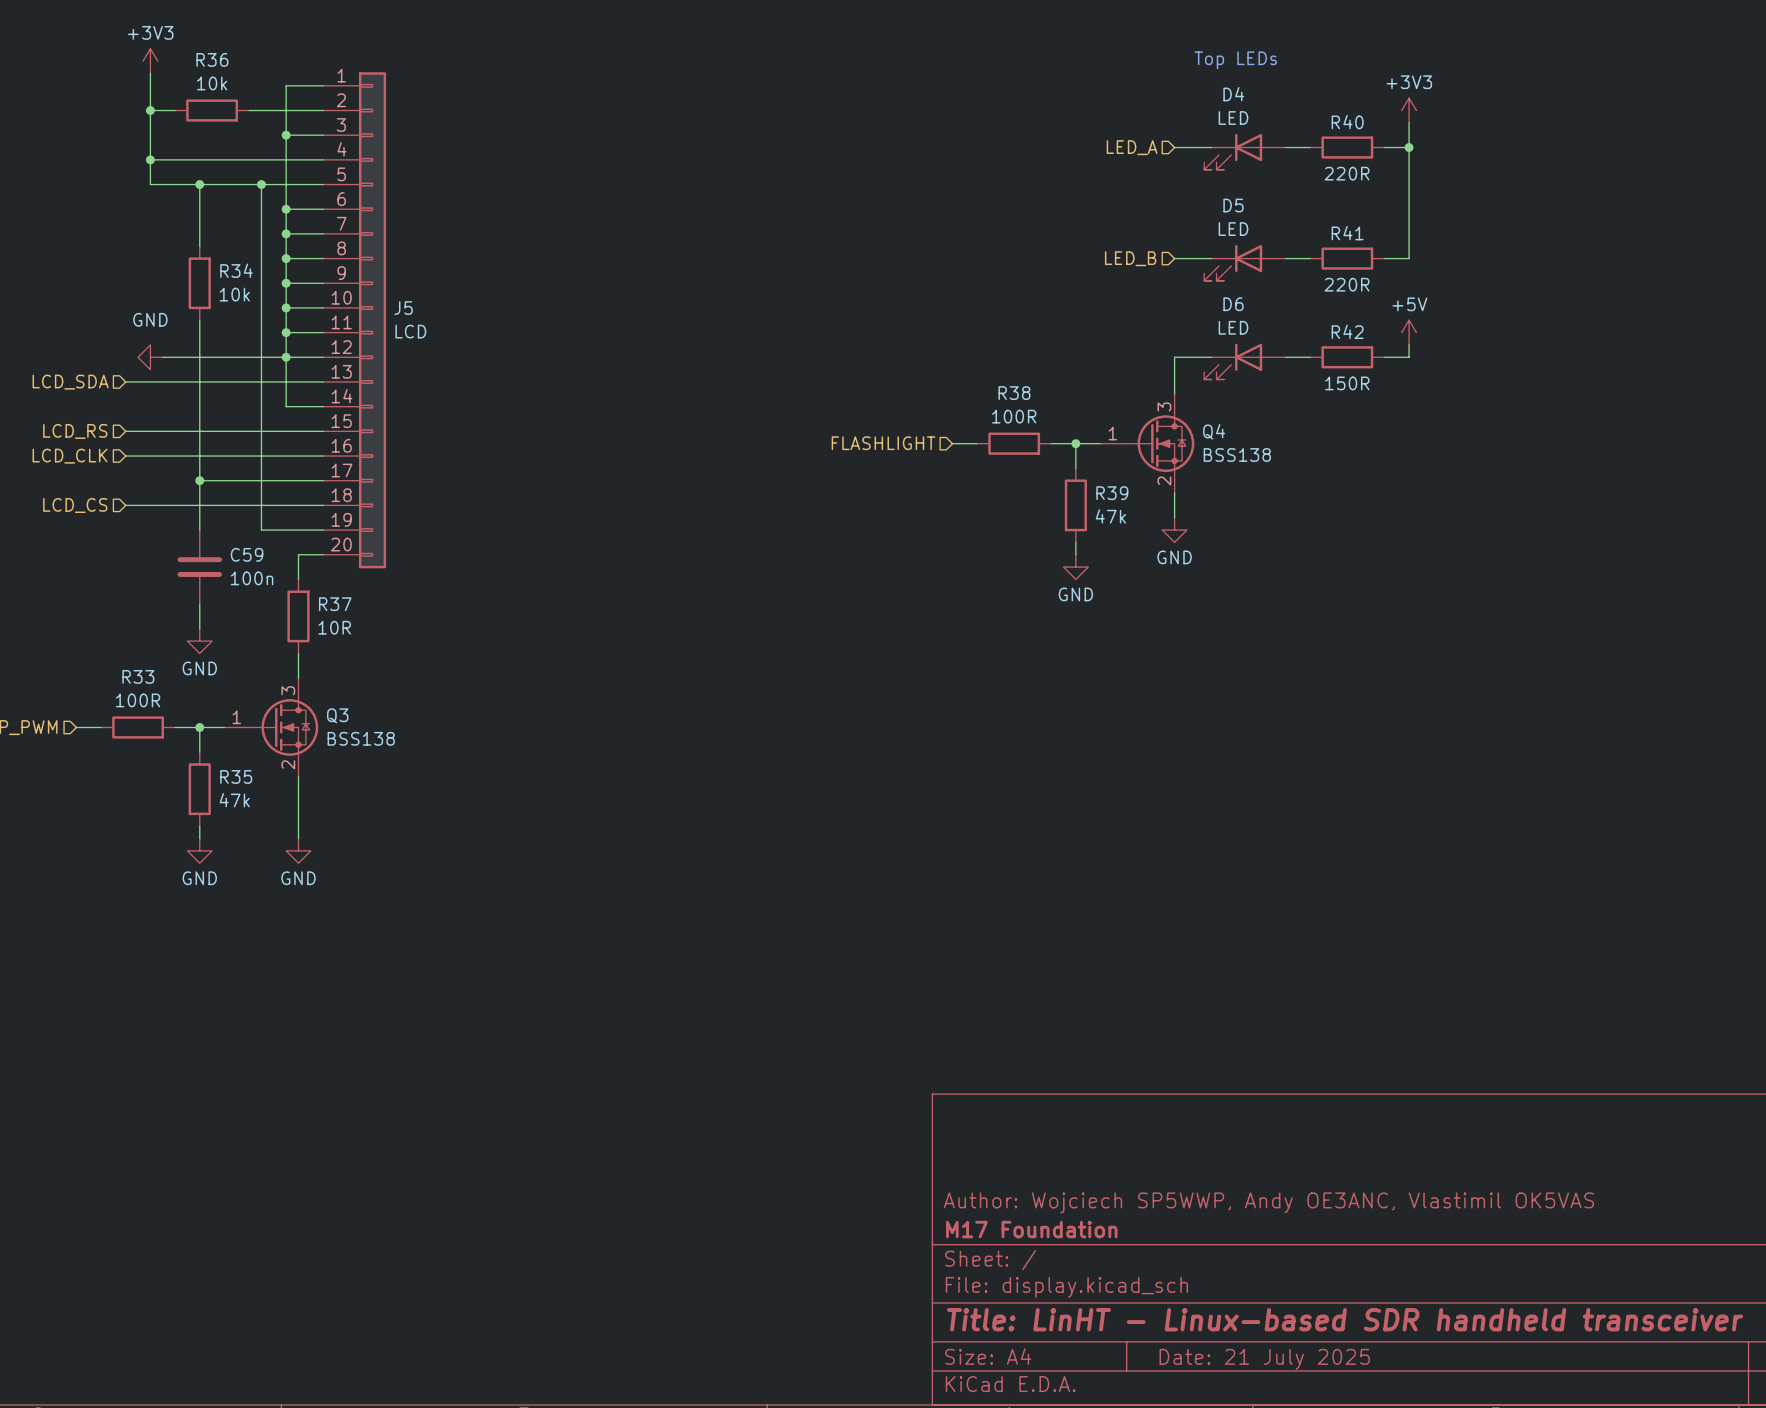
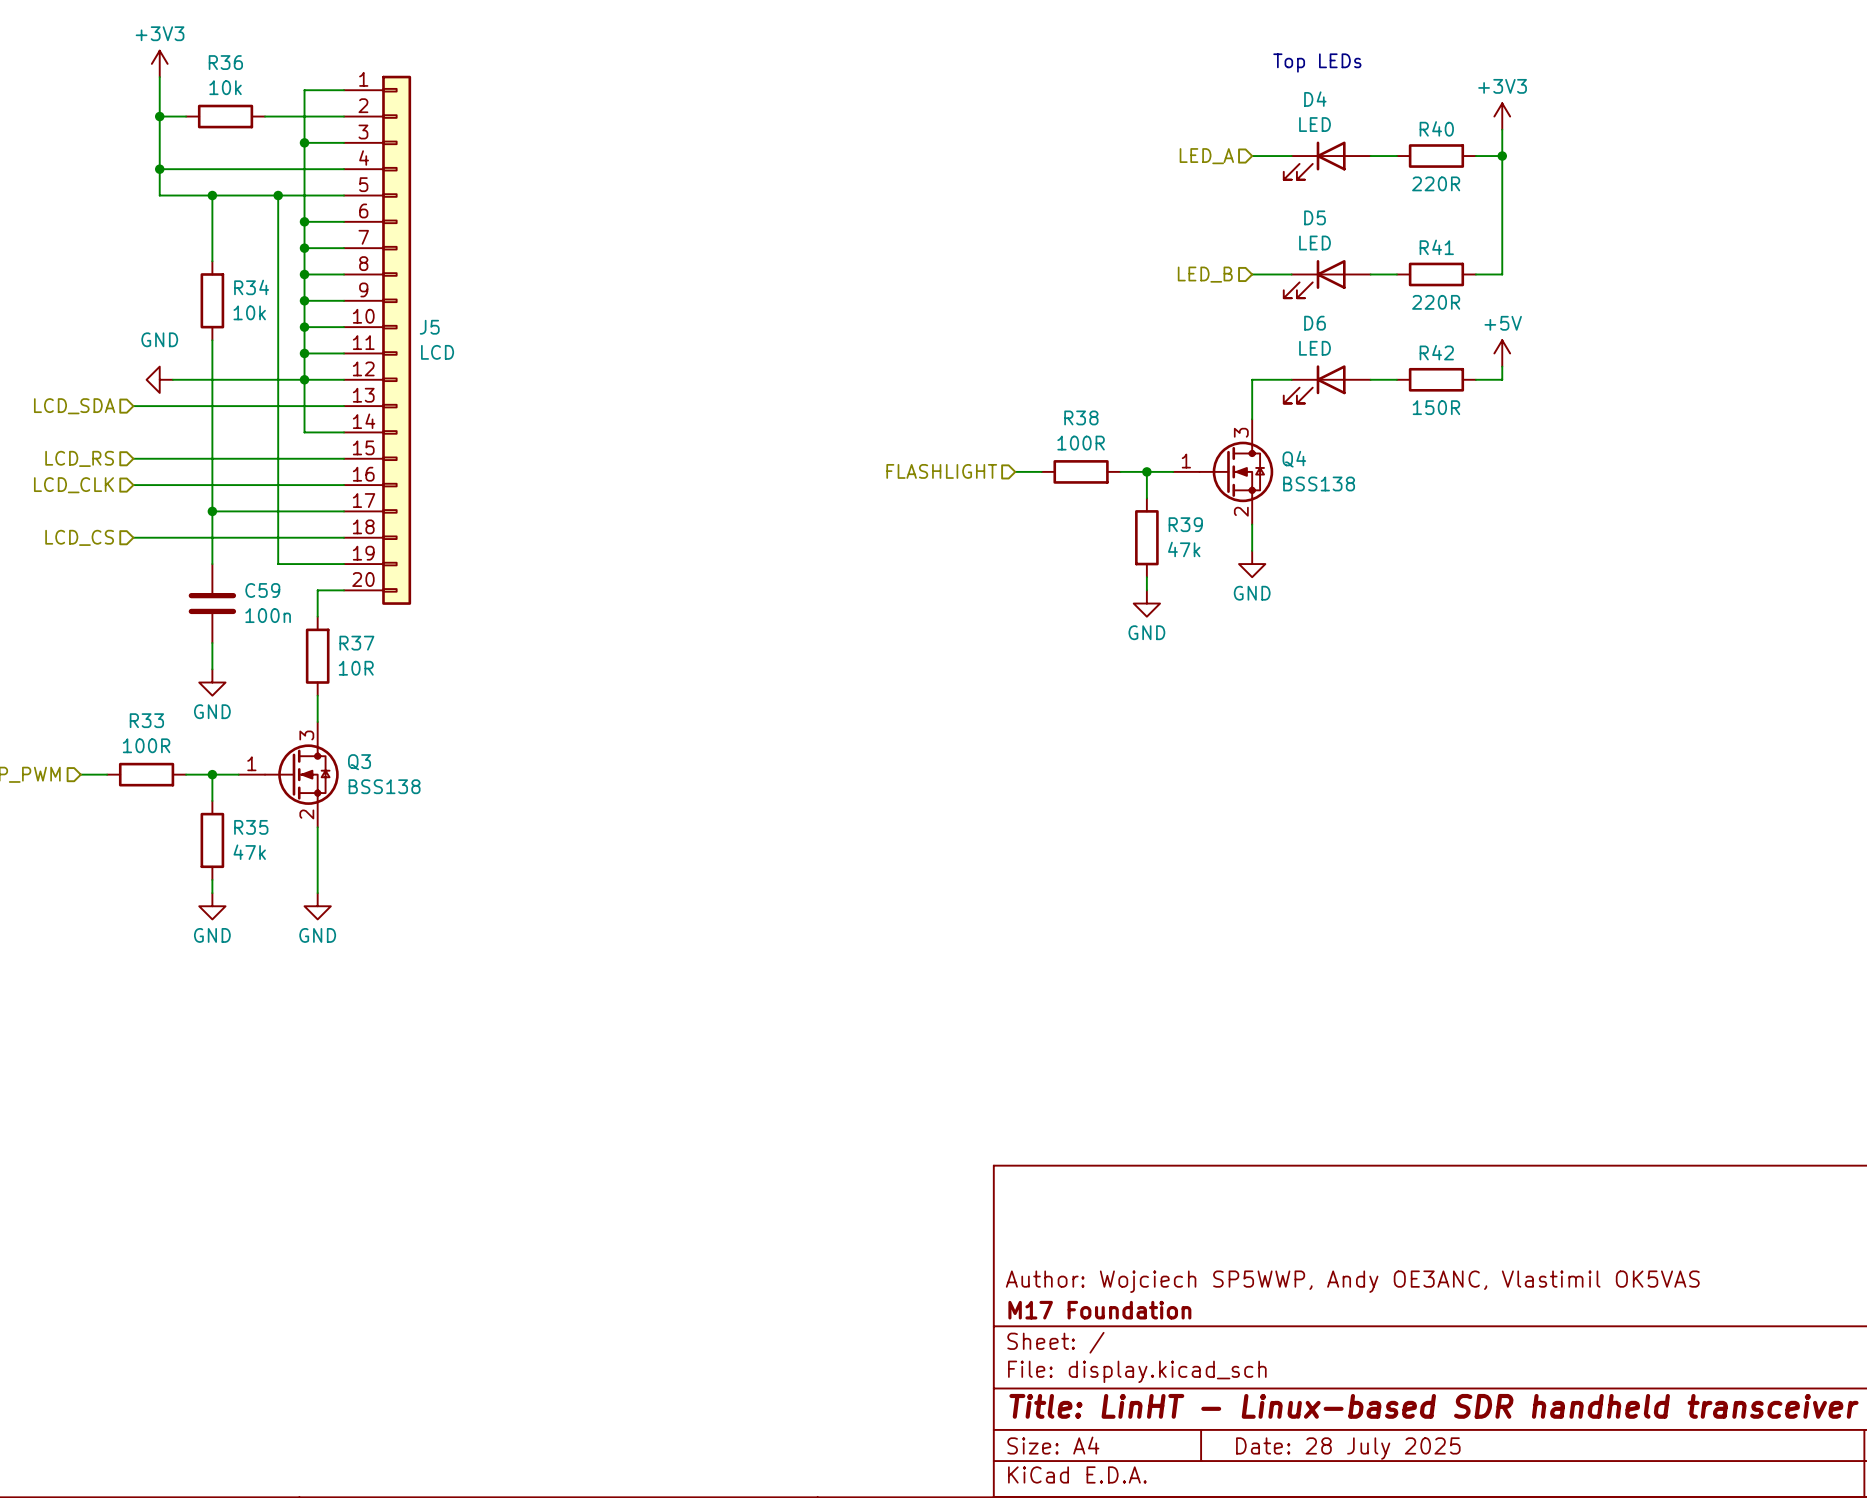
title block: Date: 21 July 2025 (1264, 1359) -> Date: 28 July 2025 (1348, 1448)

